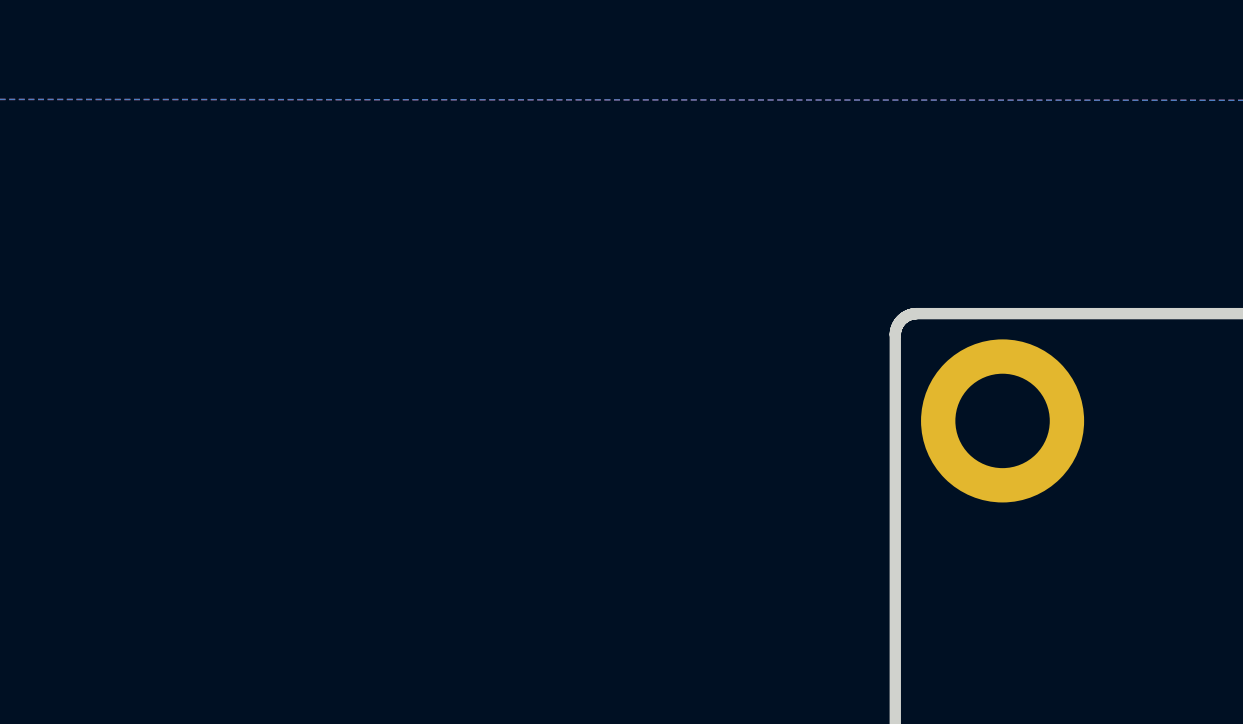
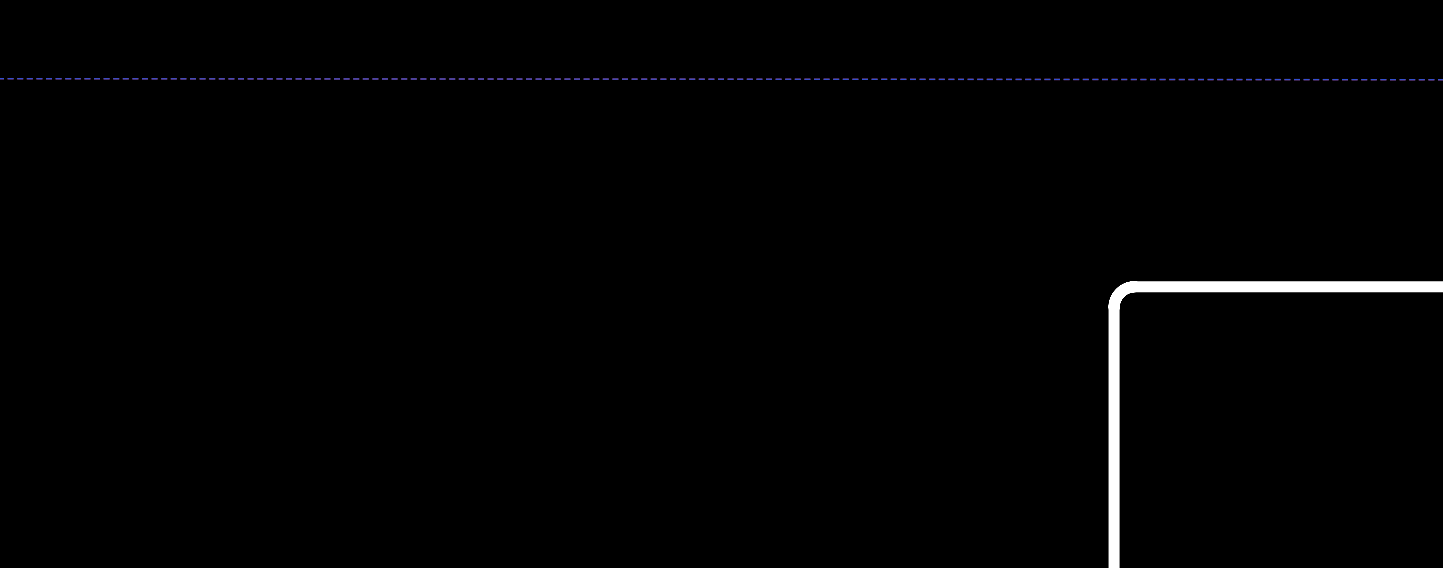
part: (1002, 420) -> none

